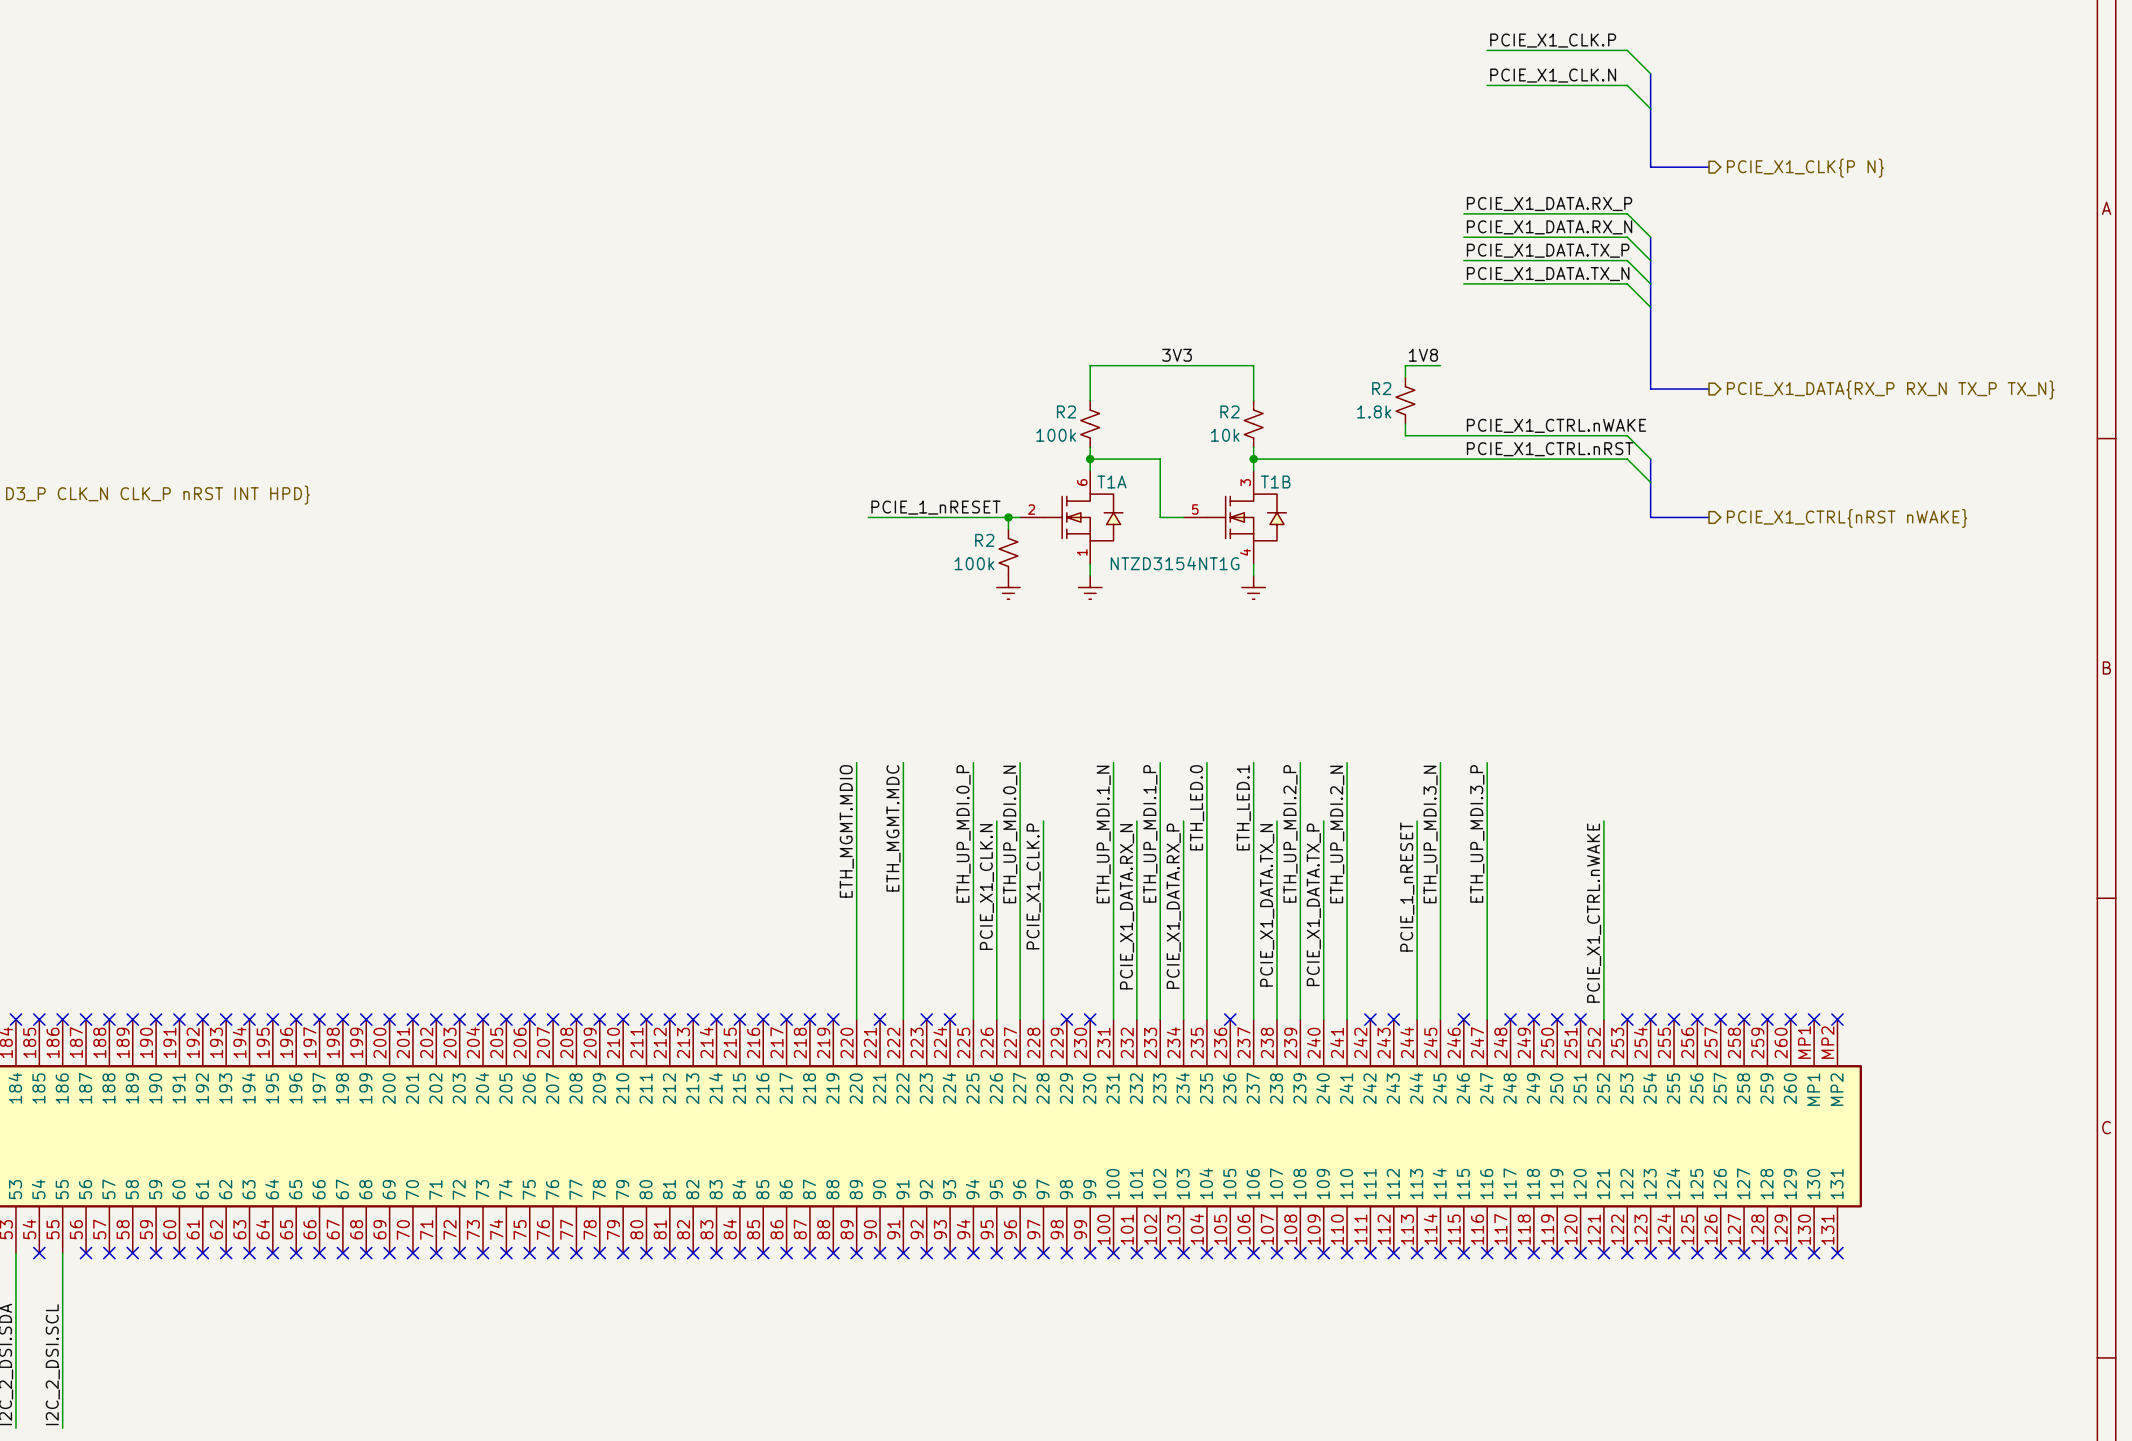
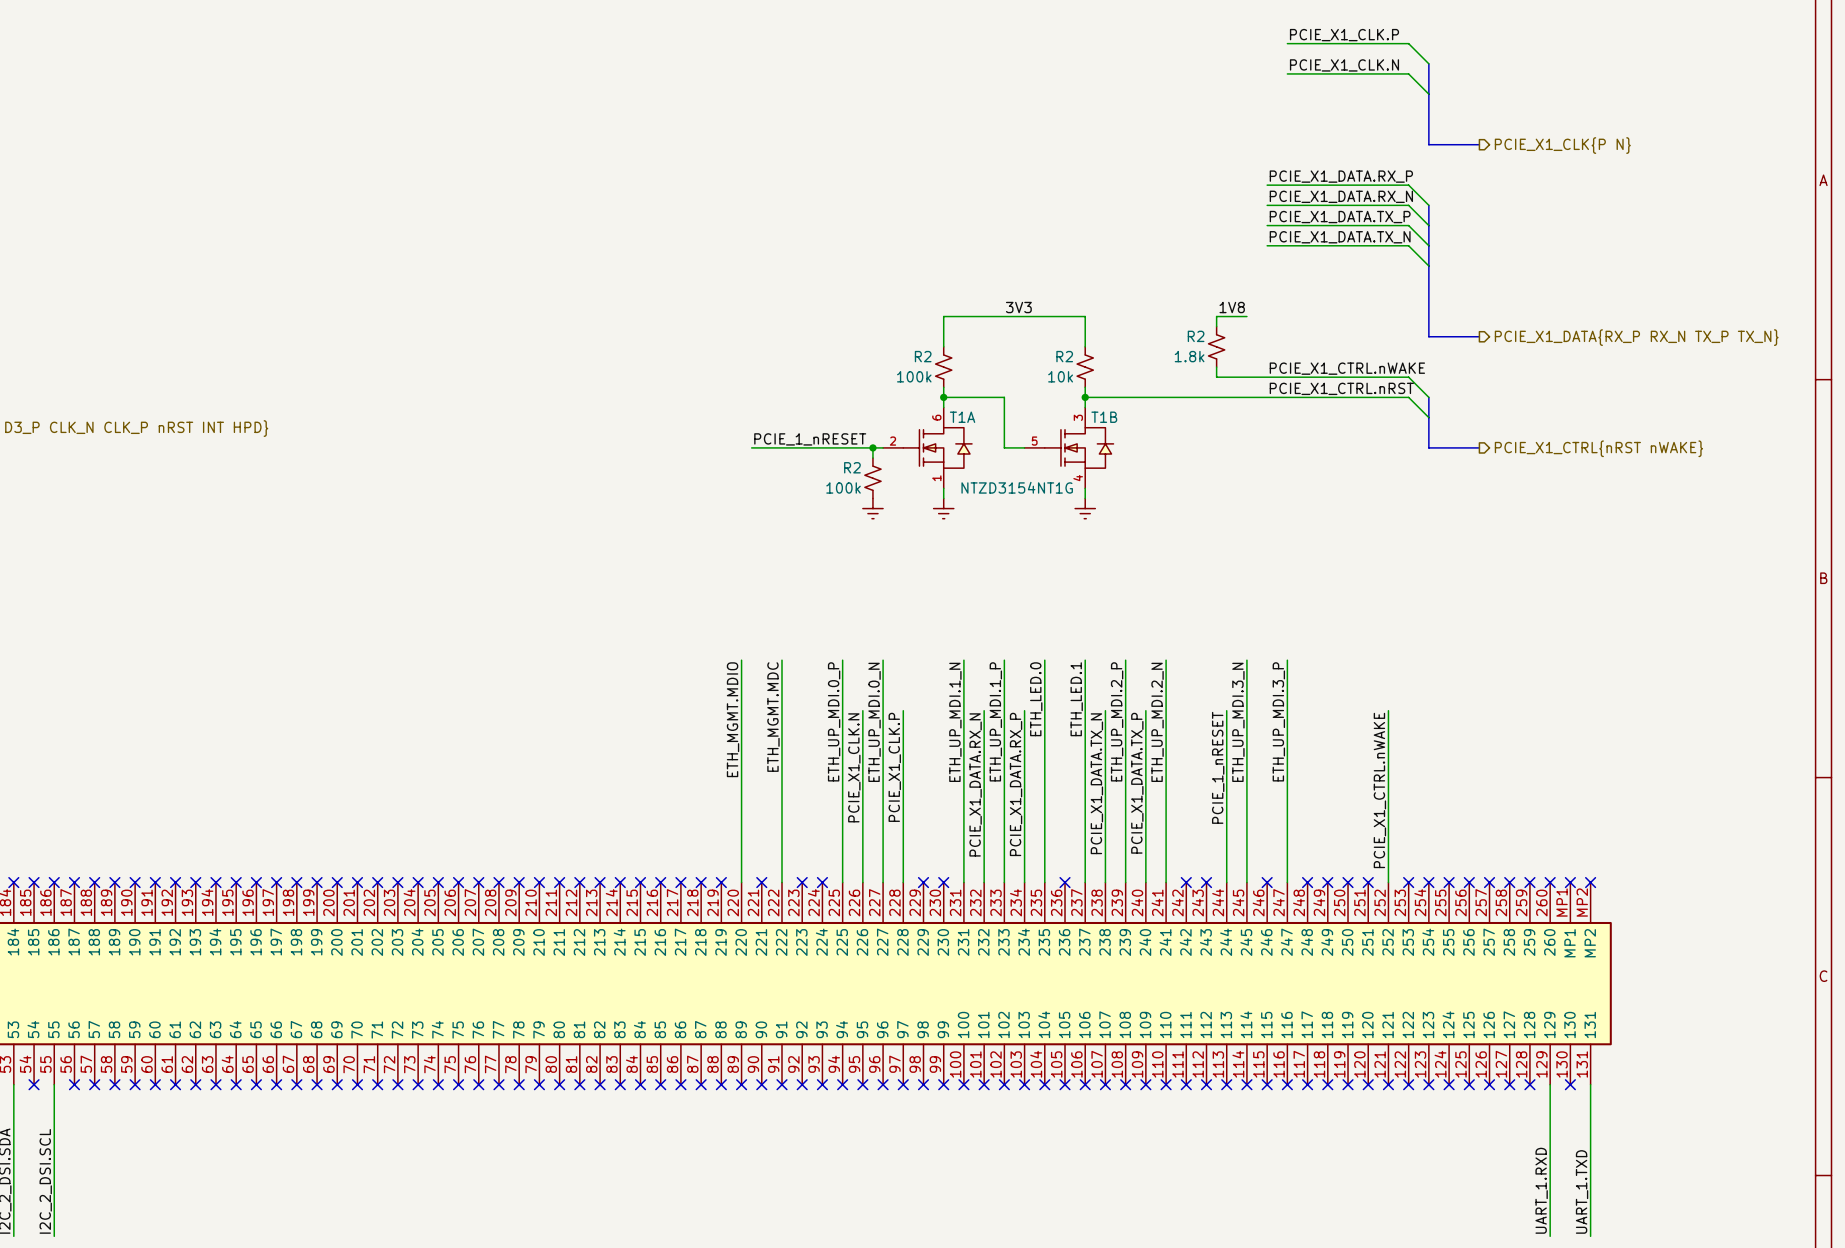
wire: none -> (1550, 1084) (1550, 1236)
no-connect mark: (1790, 1253) -> none
wire: none -> (1590, 1084) (1590, 1236)
no-connect mark: (1837, 1253) -> none
label: none -> UART_1.RXD (1541, 1190)
label: none -> UART_1.TXD (1582, 1191)

